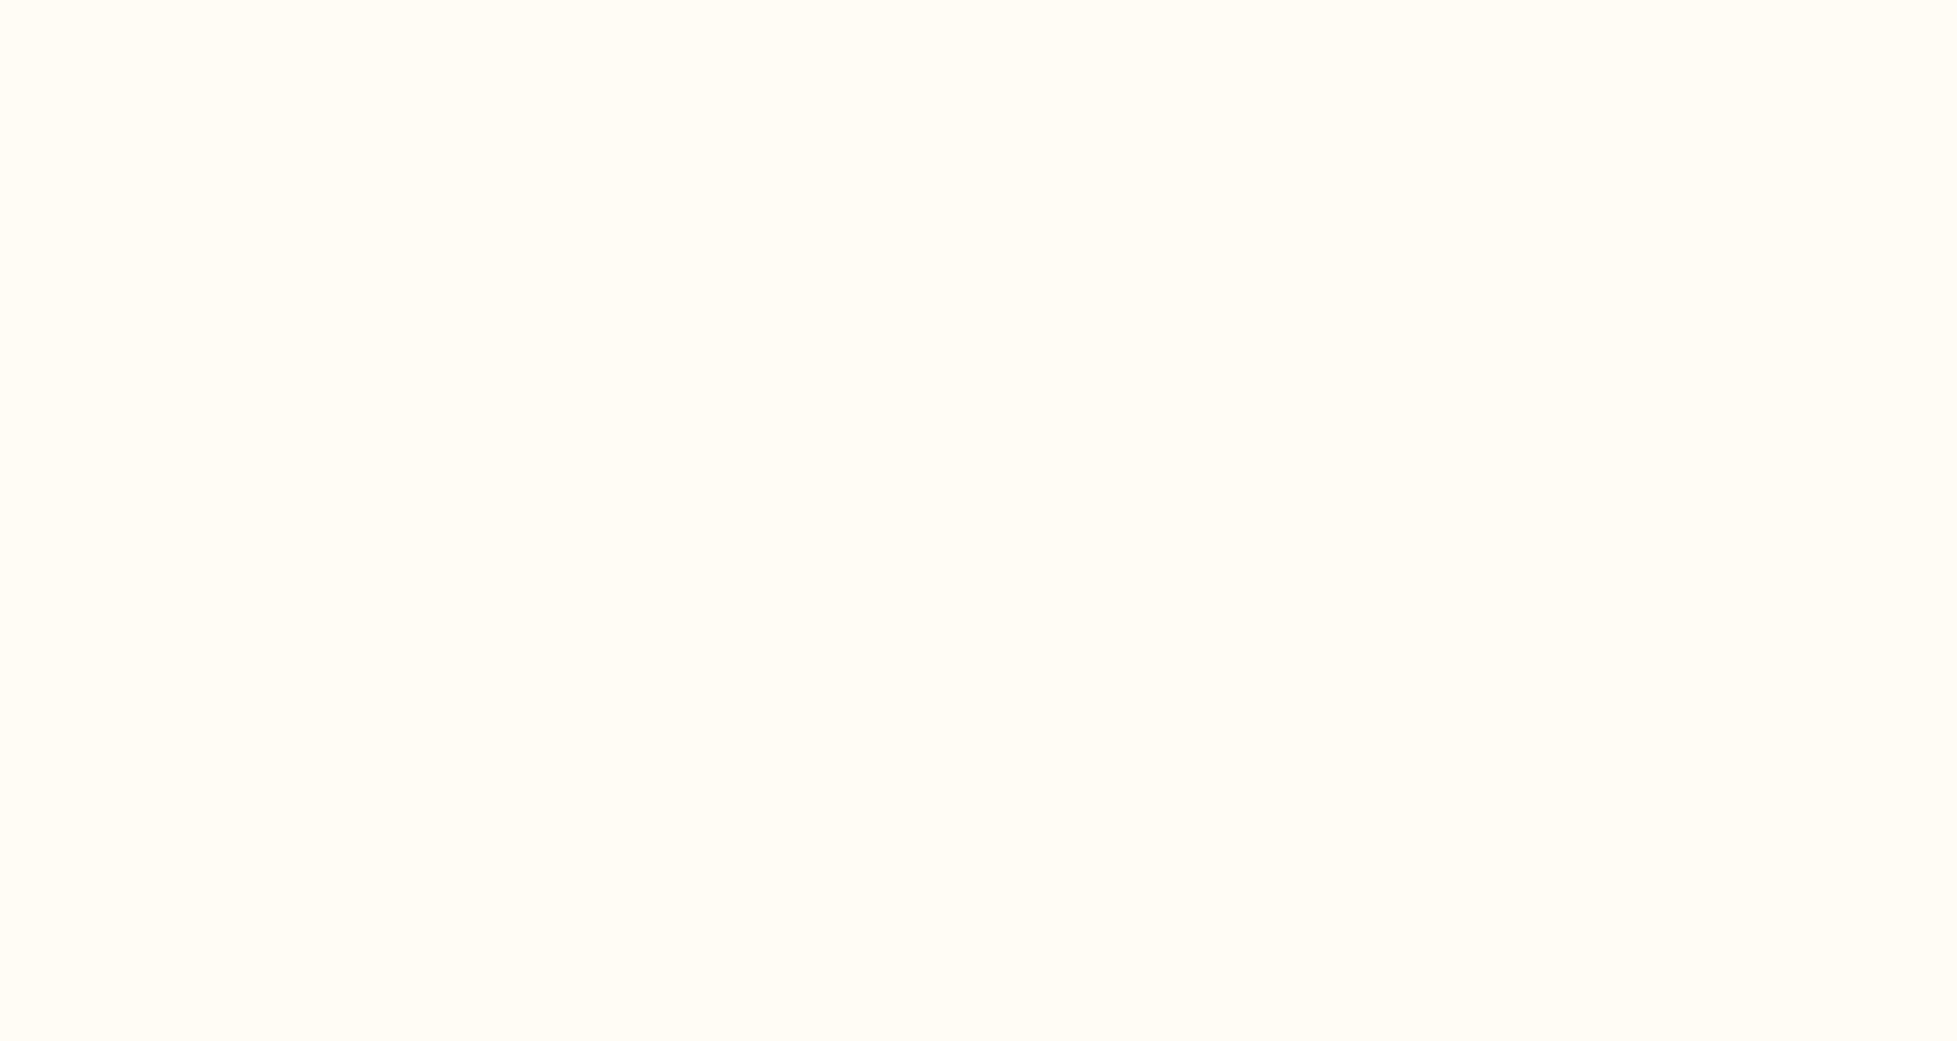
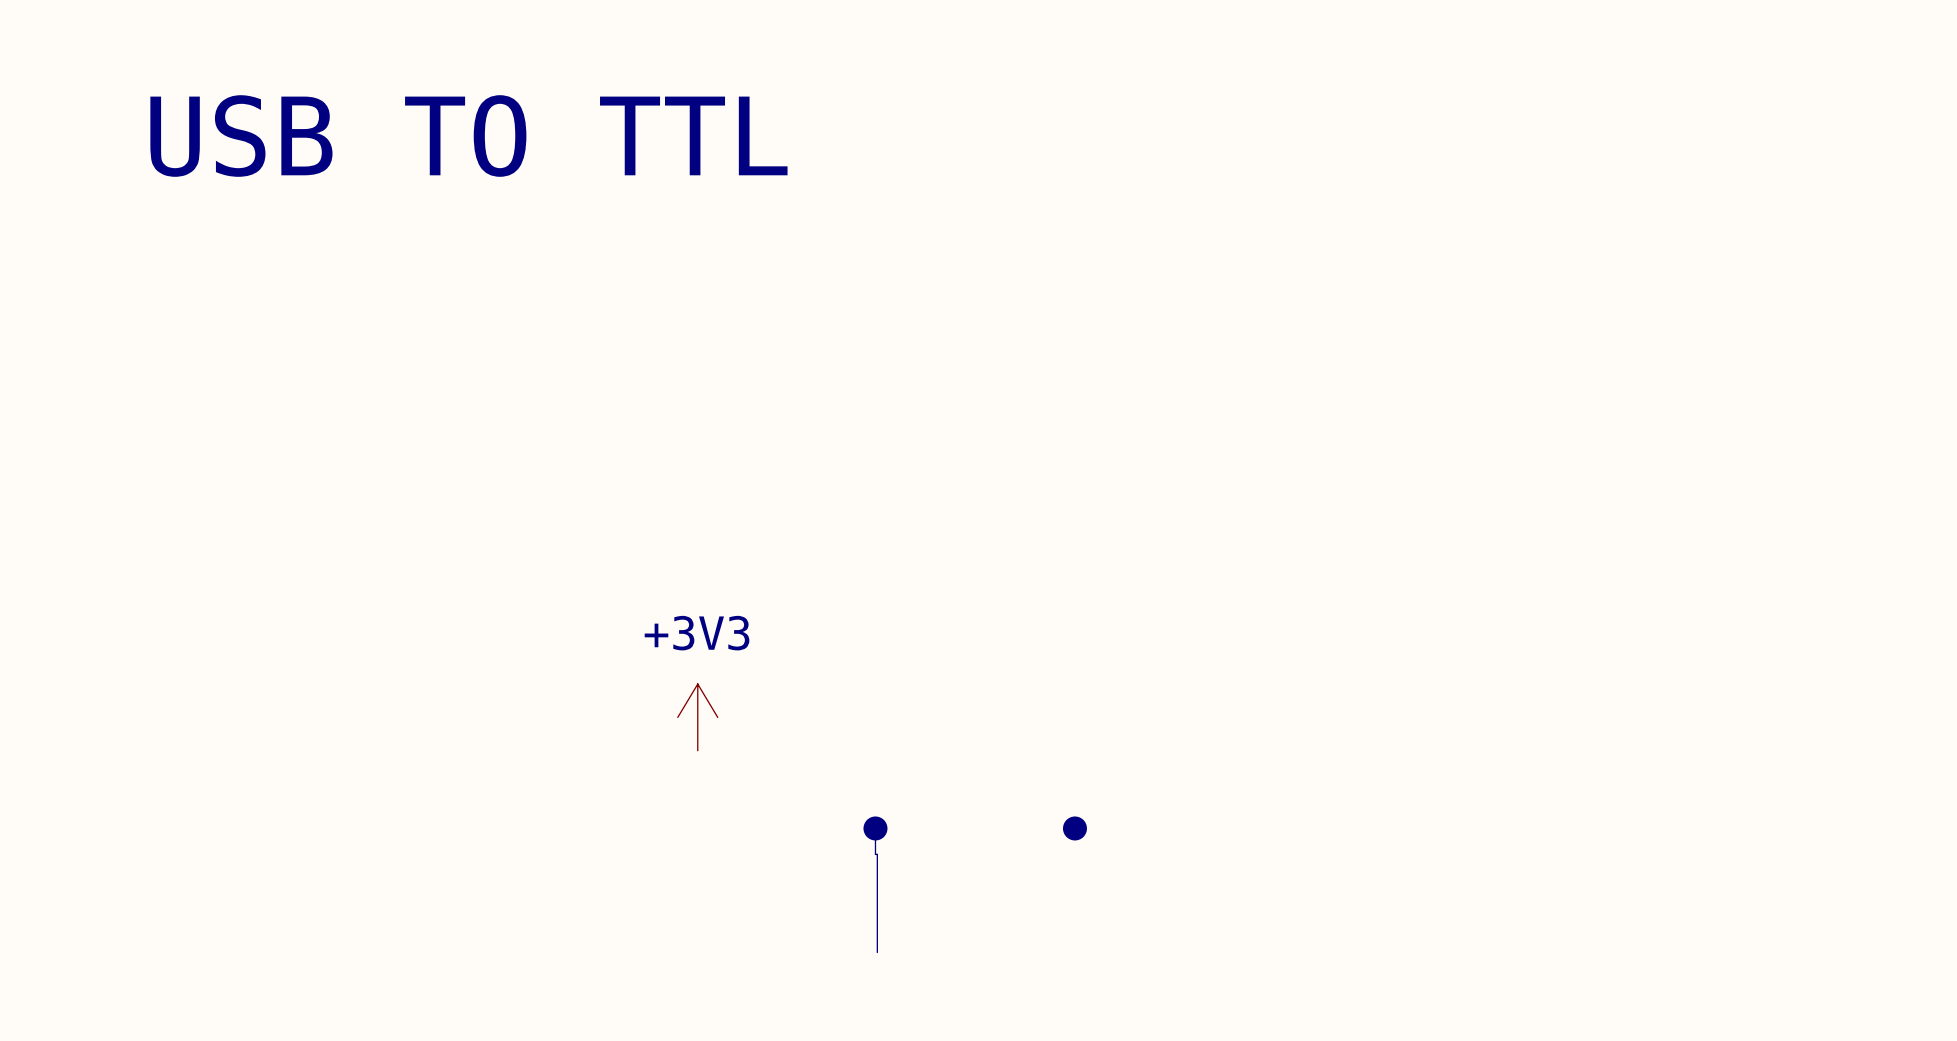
text: none -> USB TO TTL (468, 136)
power symbol: none -> +3V3 (697, 717)
wire: none -> (875, 828) (877, 952)
junction: none -> (875, 828)
junction: none -> (1074, 828)

